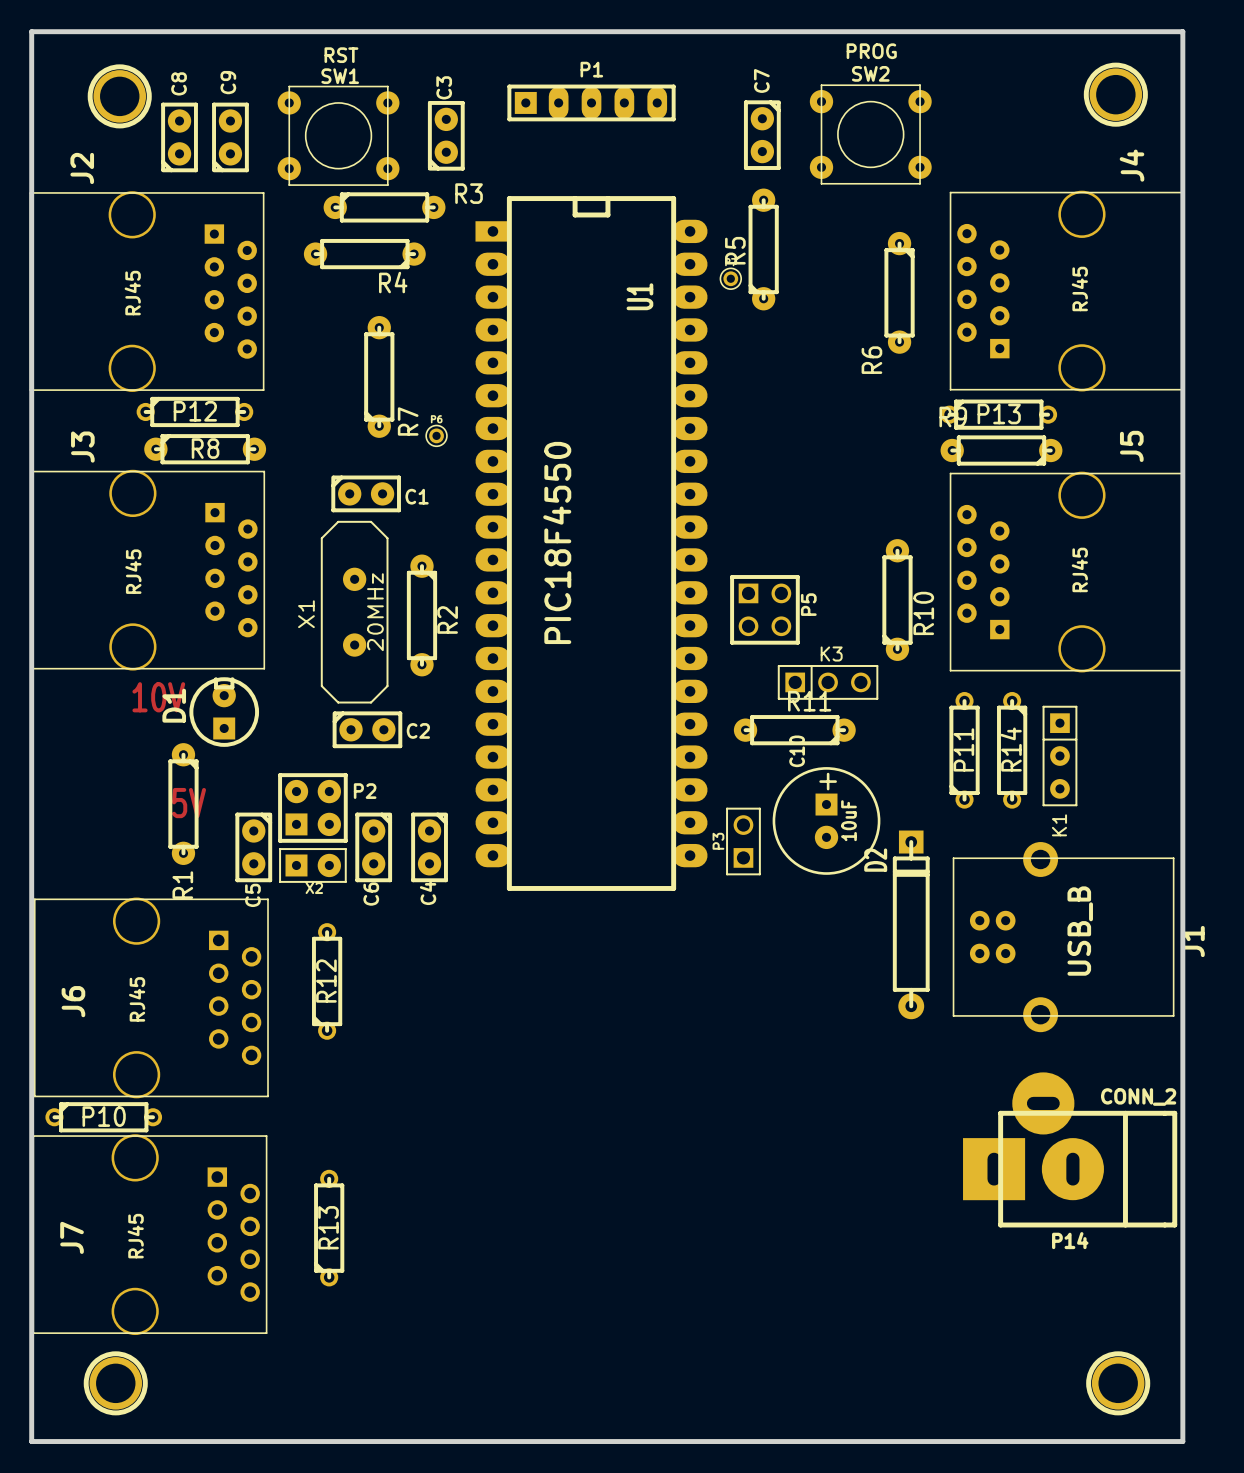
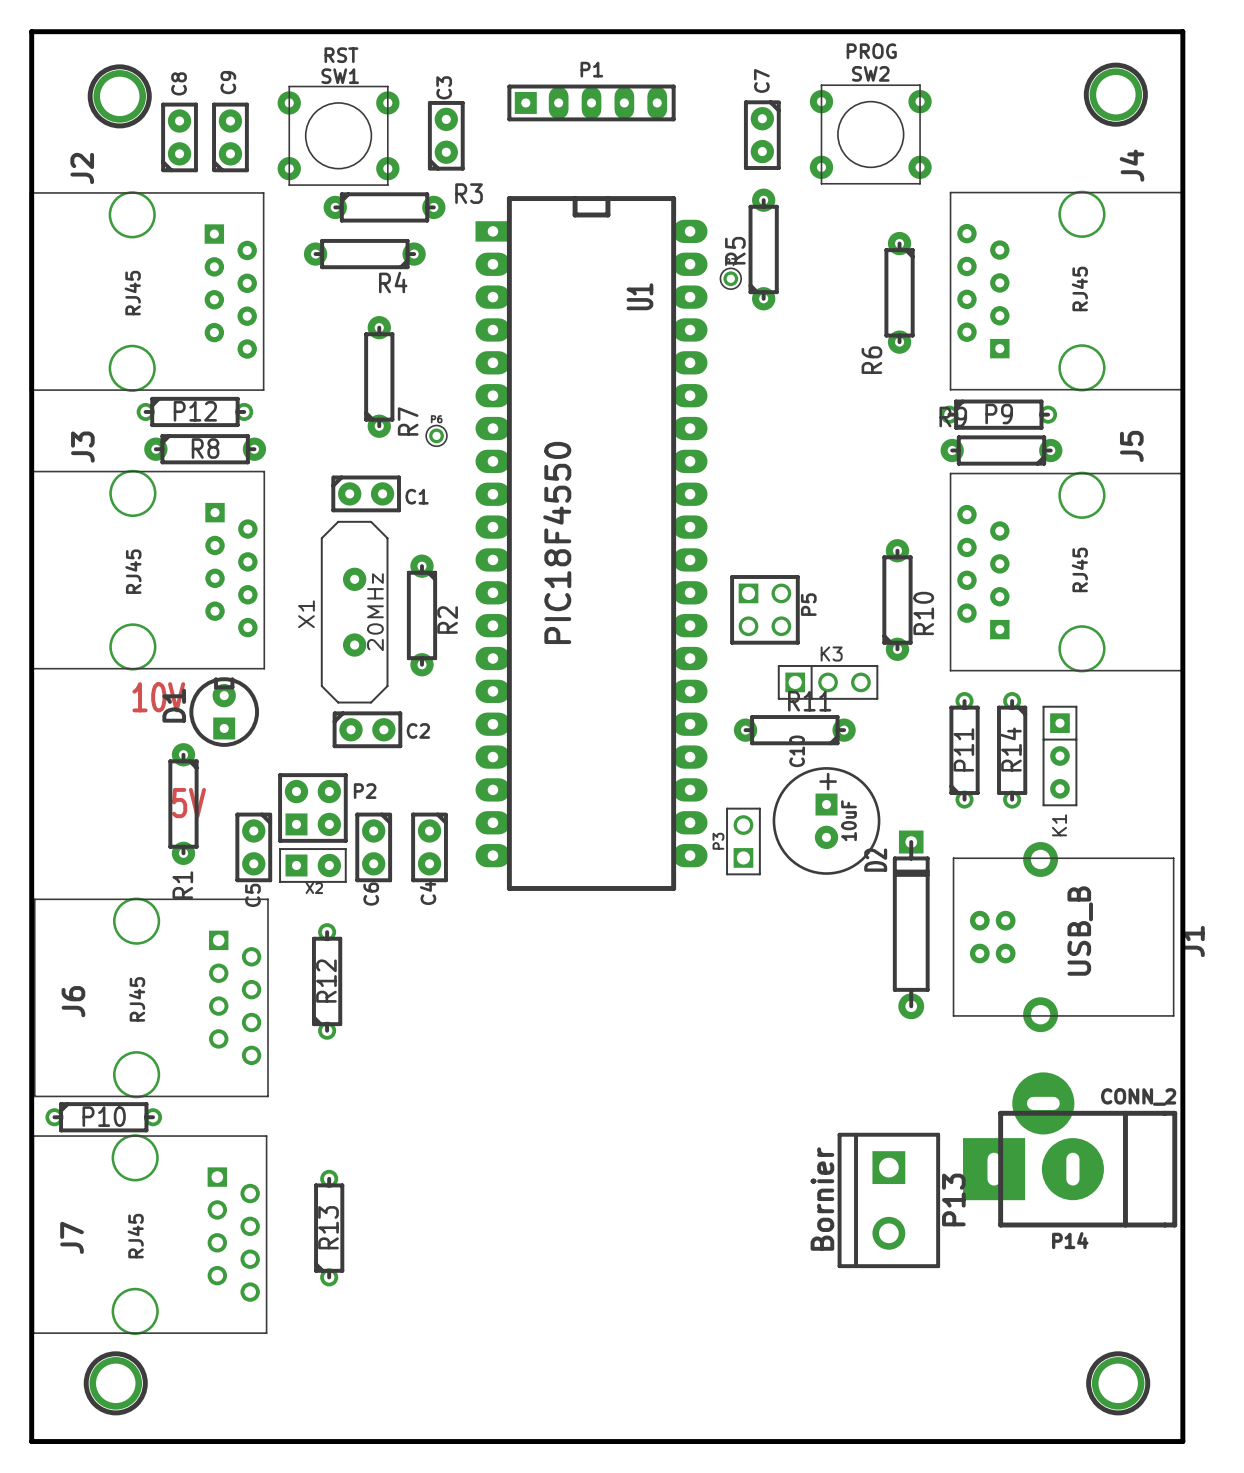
P13 name: P13 (999, 413) -> P9 (999, 413)
P13: none -> Bornier (888, 1200)

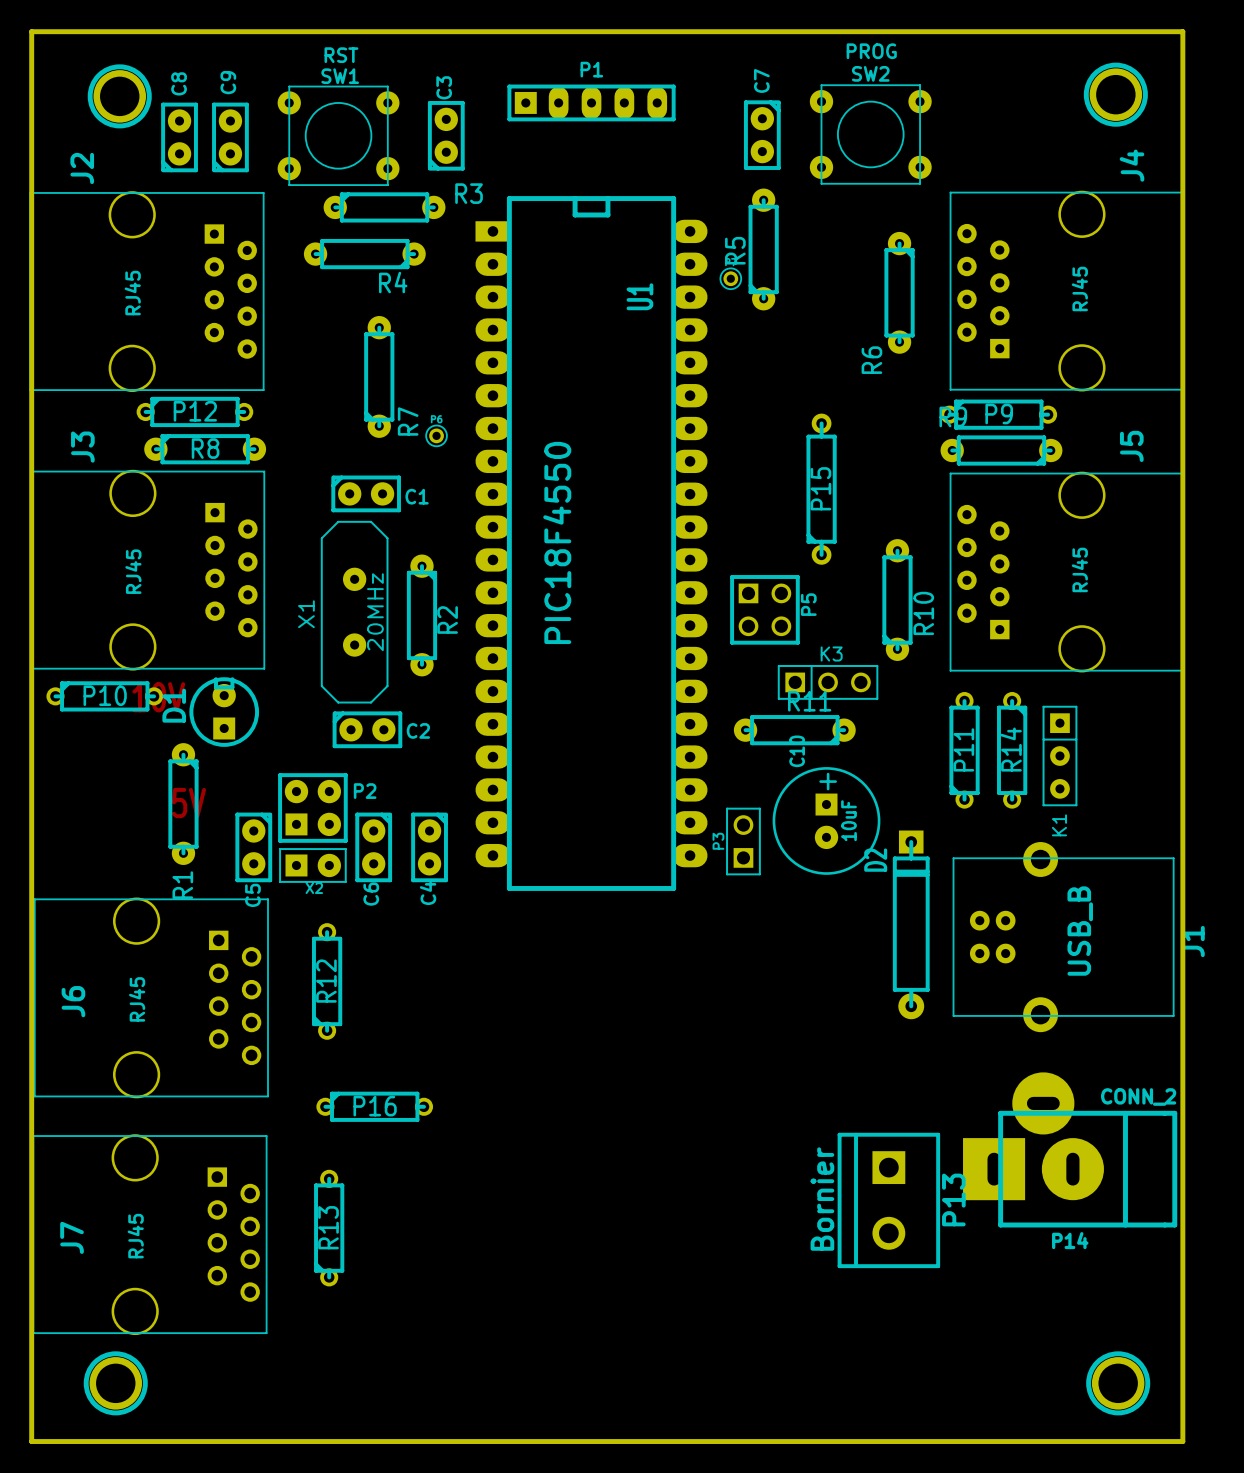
P15: none -> (821, 489)
P16: none -> (374, 1106)
P10 position: (103, 1117) -> (104, 696)

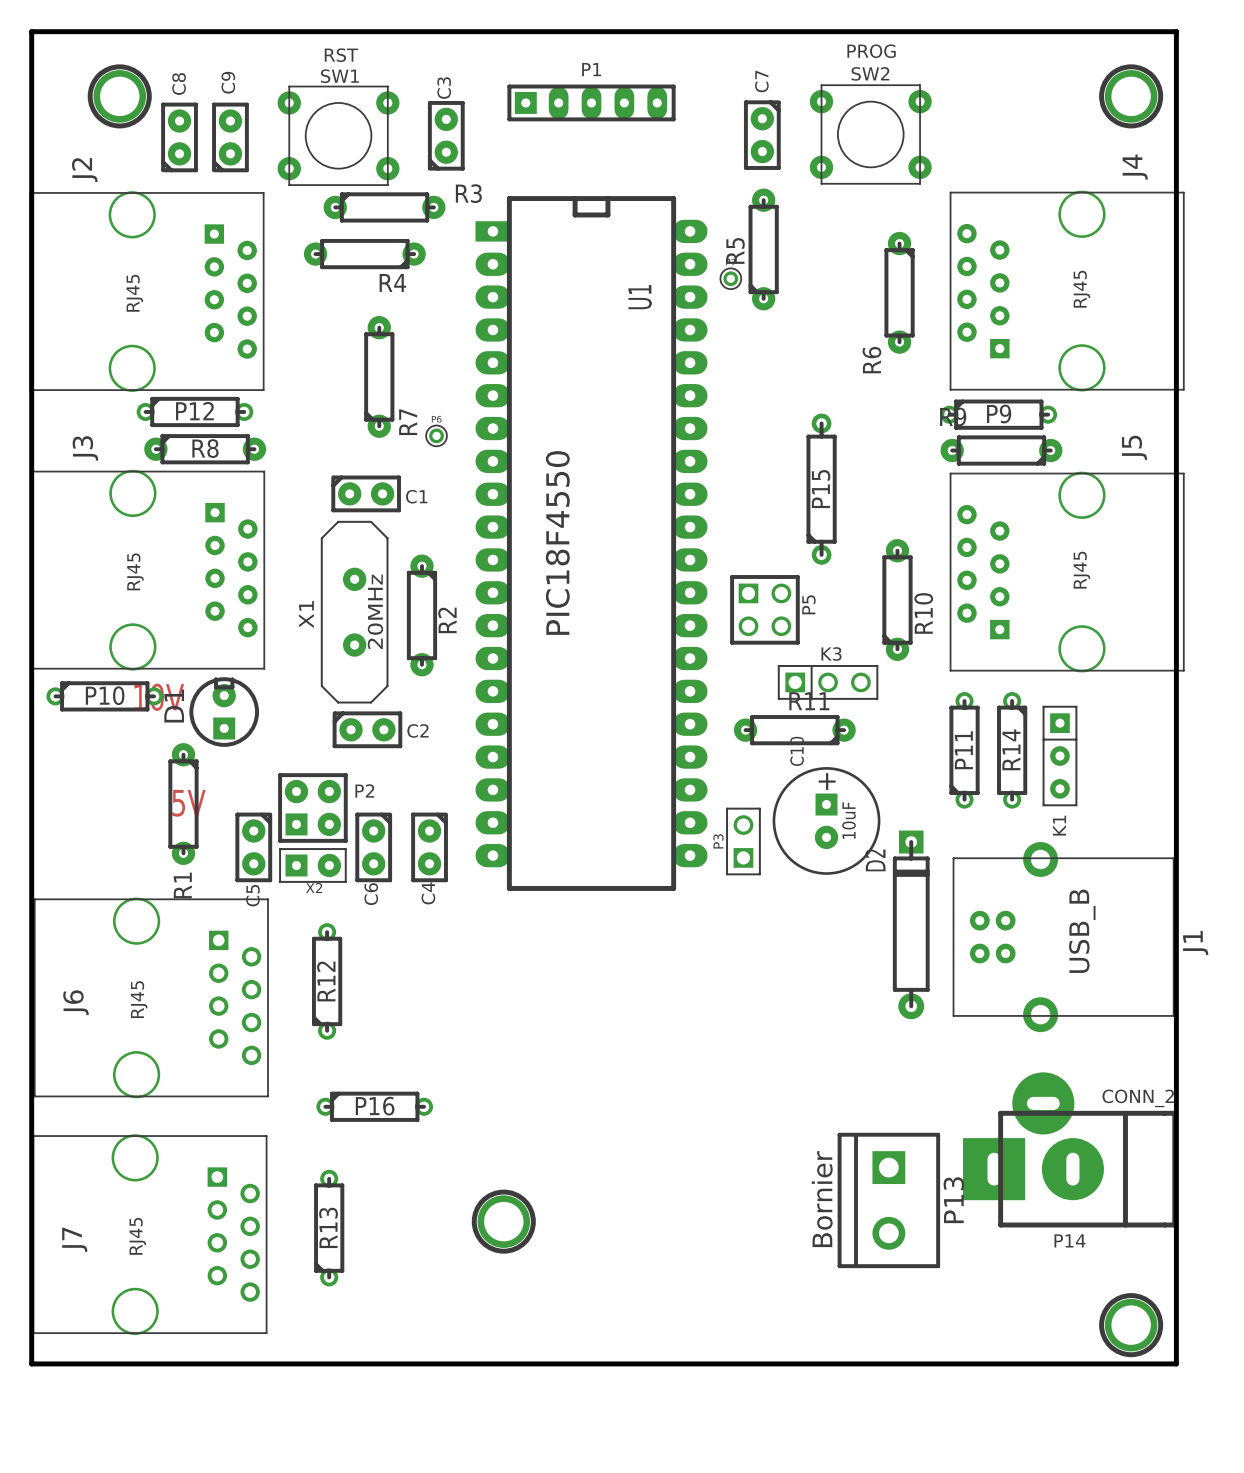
board edge: (1176, 31) (1182, 31) (1182, 1441) (31, 1441) (31, 1363) -> (1176, 31) (1176, 1363) (31, 1363)
part position: (1115, 94) -> (1131, 96)
part: none -> (503, 1221)
part: (115, 1383) -> none
part position: (1118, 1383) -> (1131, 1325)

